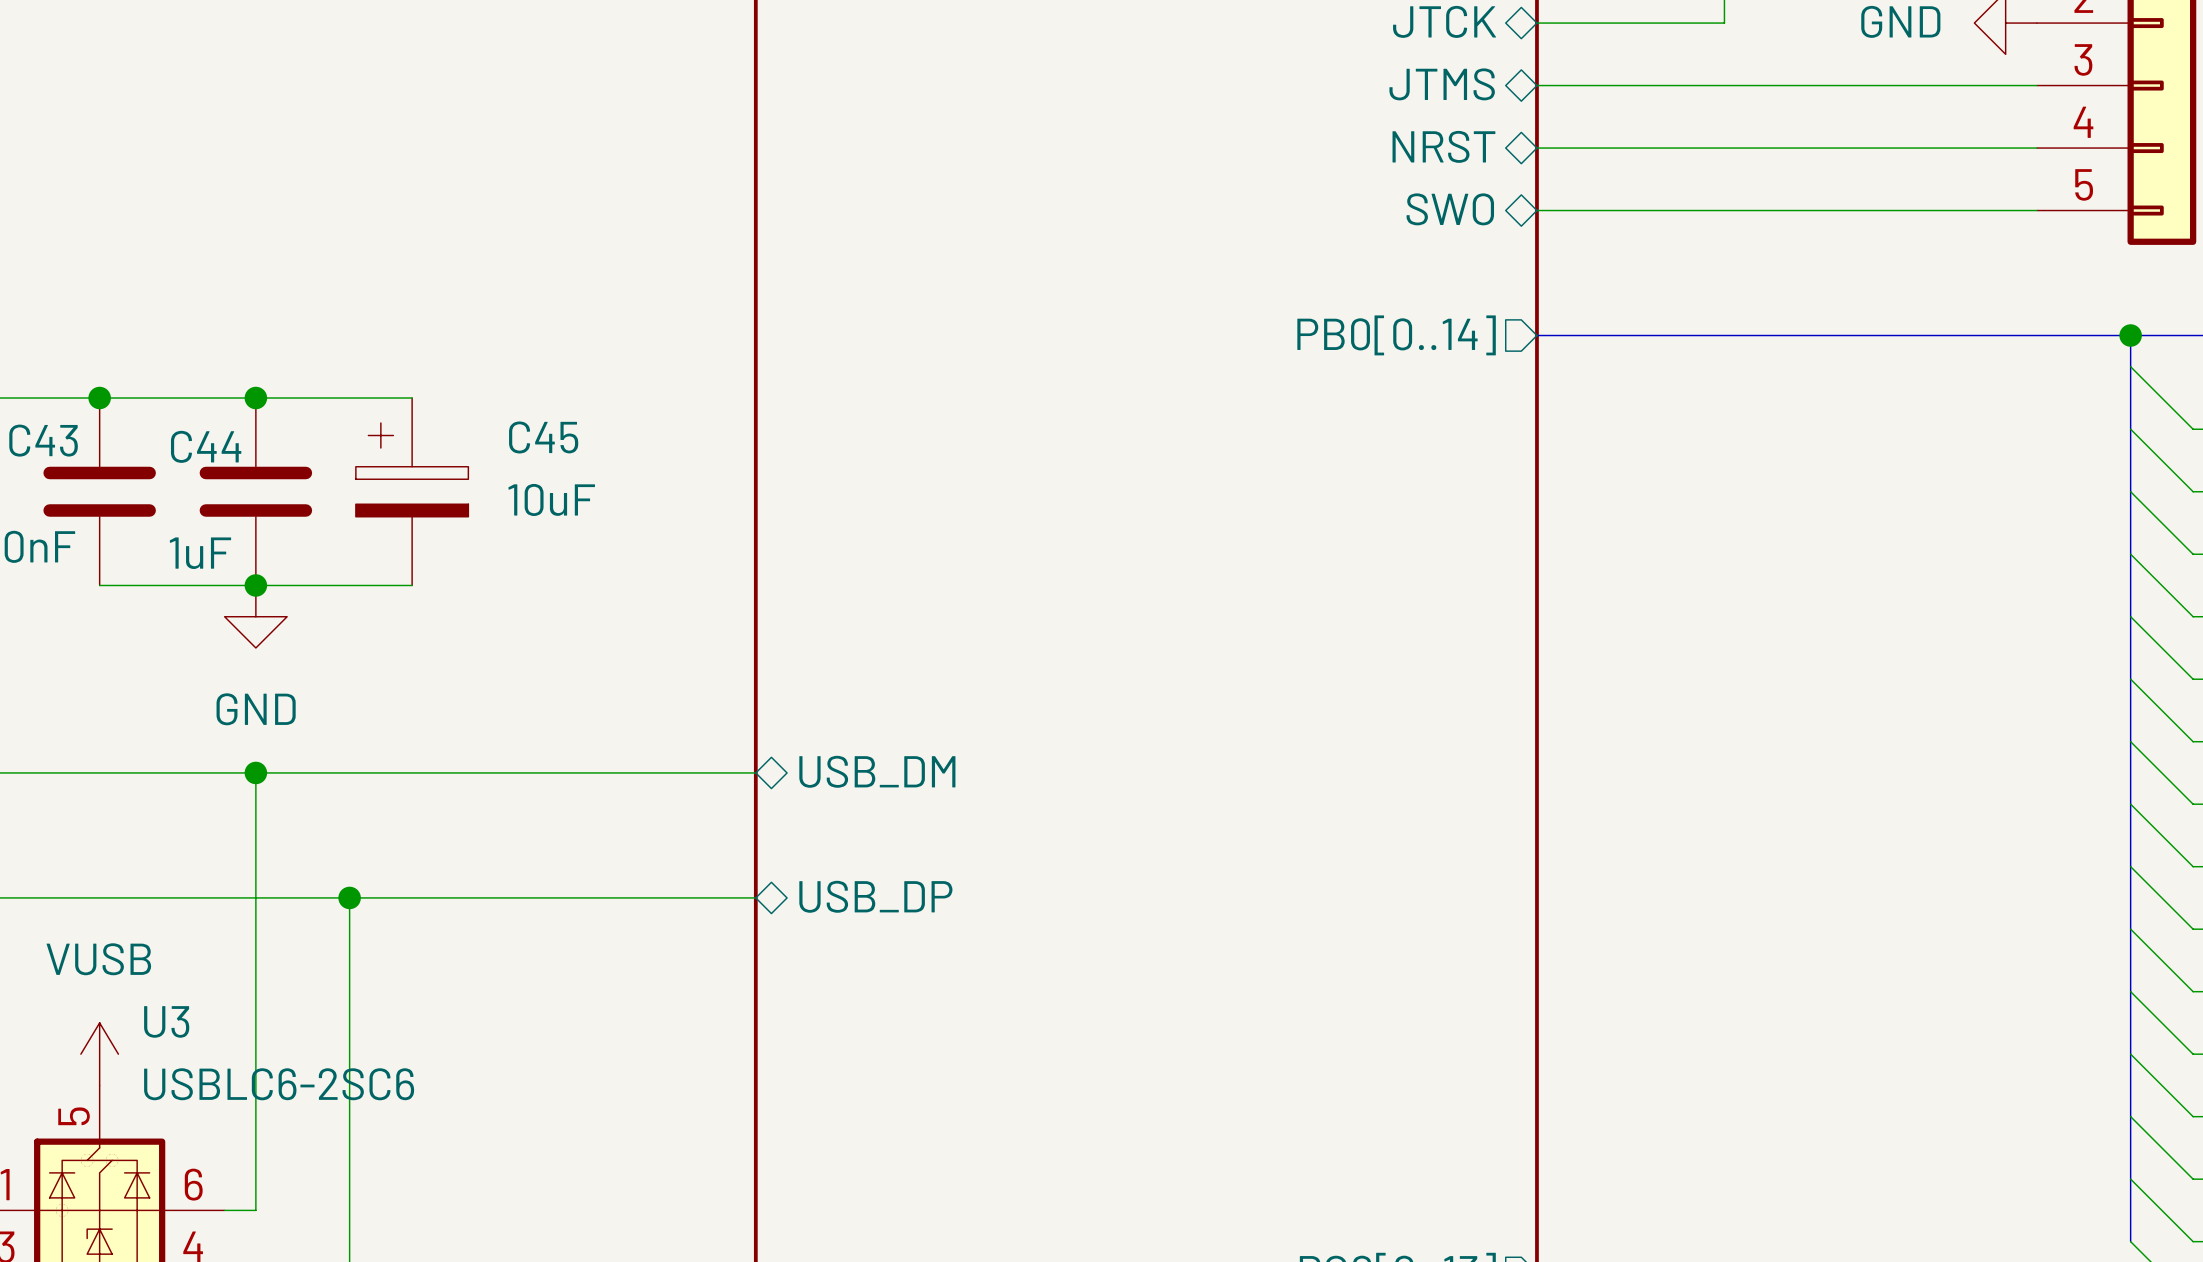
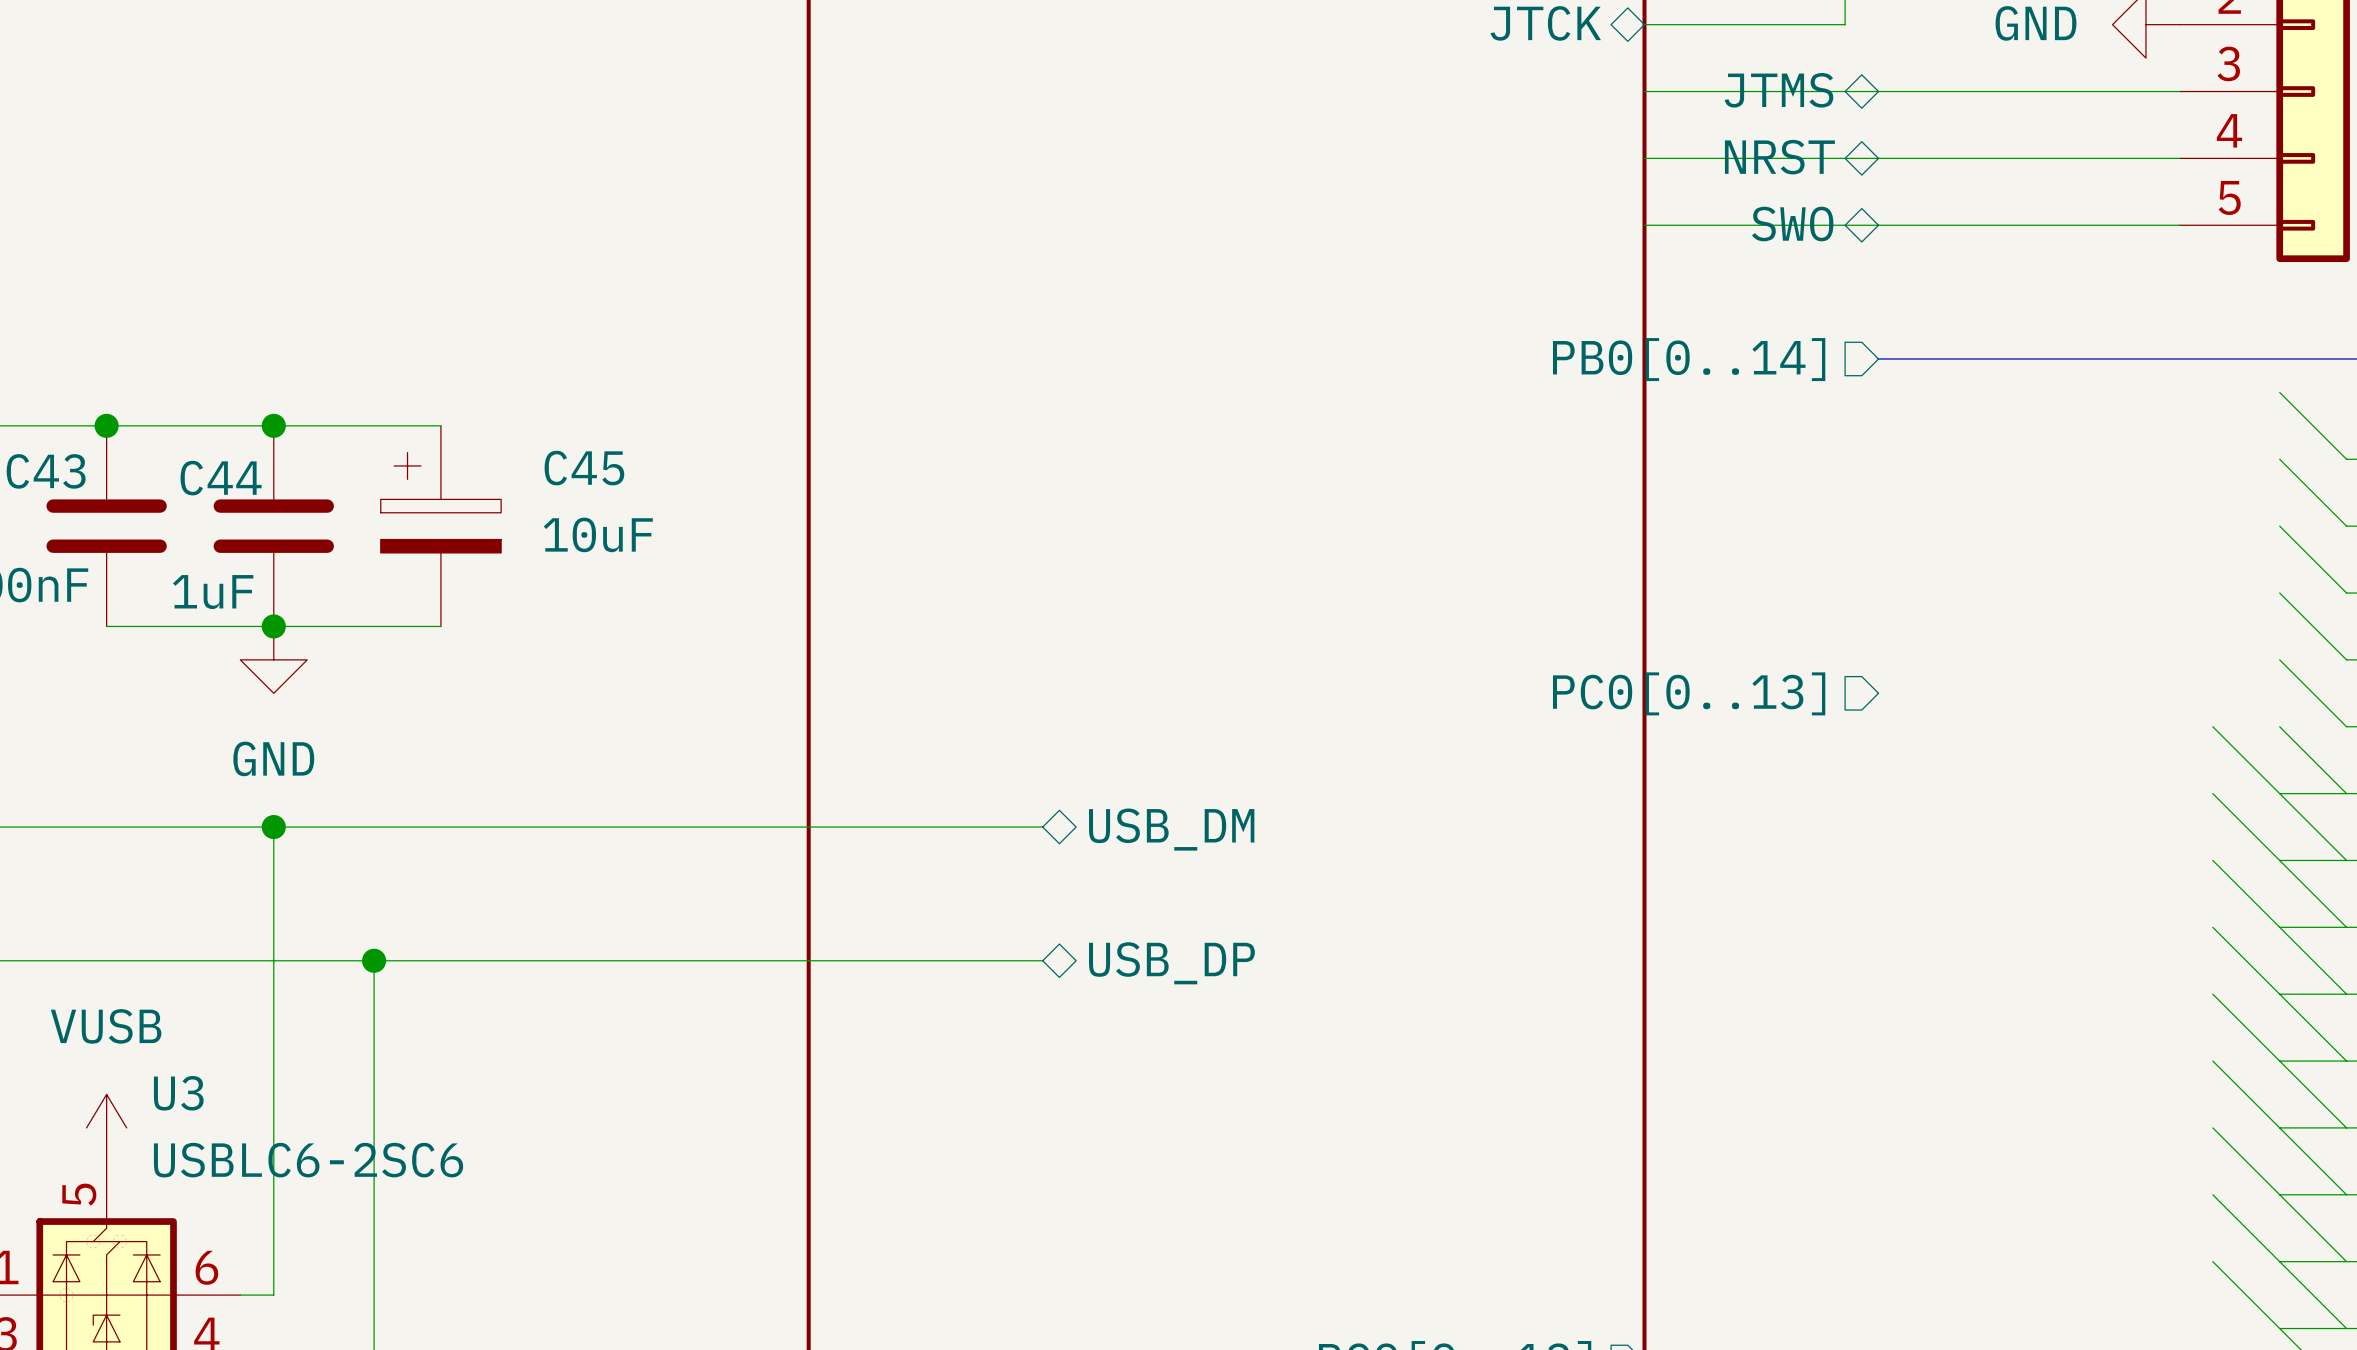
sheet pin position: JTMS (1442, 84) -> JTMS (1778, 90)
sheet pin position: NRST (1443, 146) -> NRST (1779, 157)
sheet pin position: SWO (1450, 209) -> SWO (1792, 224)
sheet pin position: PB0[0..14] (1396, 335) -> PB0[0..14] (1689, 359)
bus: (1536, 335) (1755, 335) -> none
bus: (2130, 335) (2130, 1241) -> none
junction: (2130, 335) -> none
sheet pin: none -> PC0[0..13] (1689, 693)
wire: none -> (2212, 726) (2279, 793) (2346, 793)
wire: none -> (2212, 793) (2279, 860) (2346, 860)
sheet pin position: USB_DM (877, 771) -> USB_DM (1171, 829)
wire: none -> (808, 827) (1042, 827)
wire: none -> (2212, 860) (2279, 927) (2346, 927)
wire: none -> (2212, 927) (2279, 994) (2346, 994)
sheet pin position: USB_DP (875, 896) -> USB_DP (1171, 963)
wire: none -> (808, 960) (1042, 960)
wire: none -> (2212, 994) (2279, 1061) (2346, 1061)
wire: none -> (2212, 1061) (2279, 1127) (2346, 1127)
wire: none -> (2212, 1127) (2279, 1194) (2346, 1194)
wire: none -> (2212, 1194) (2279, 1261) (2346, 1261)
wire: none -> (2212, 1261) (2279, 1328) (2346, 1328)

